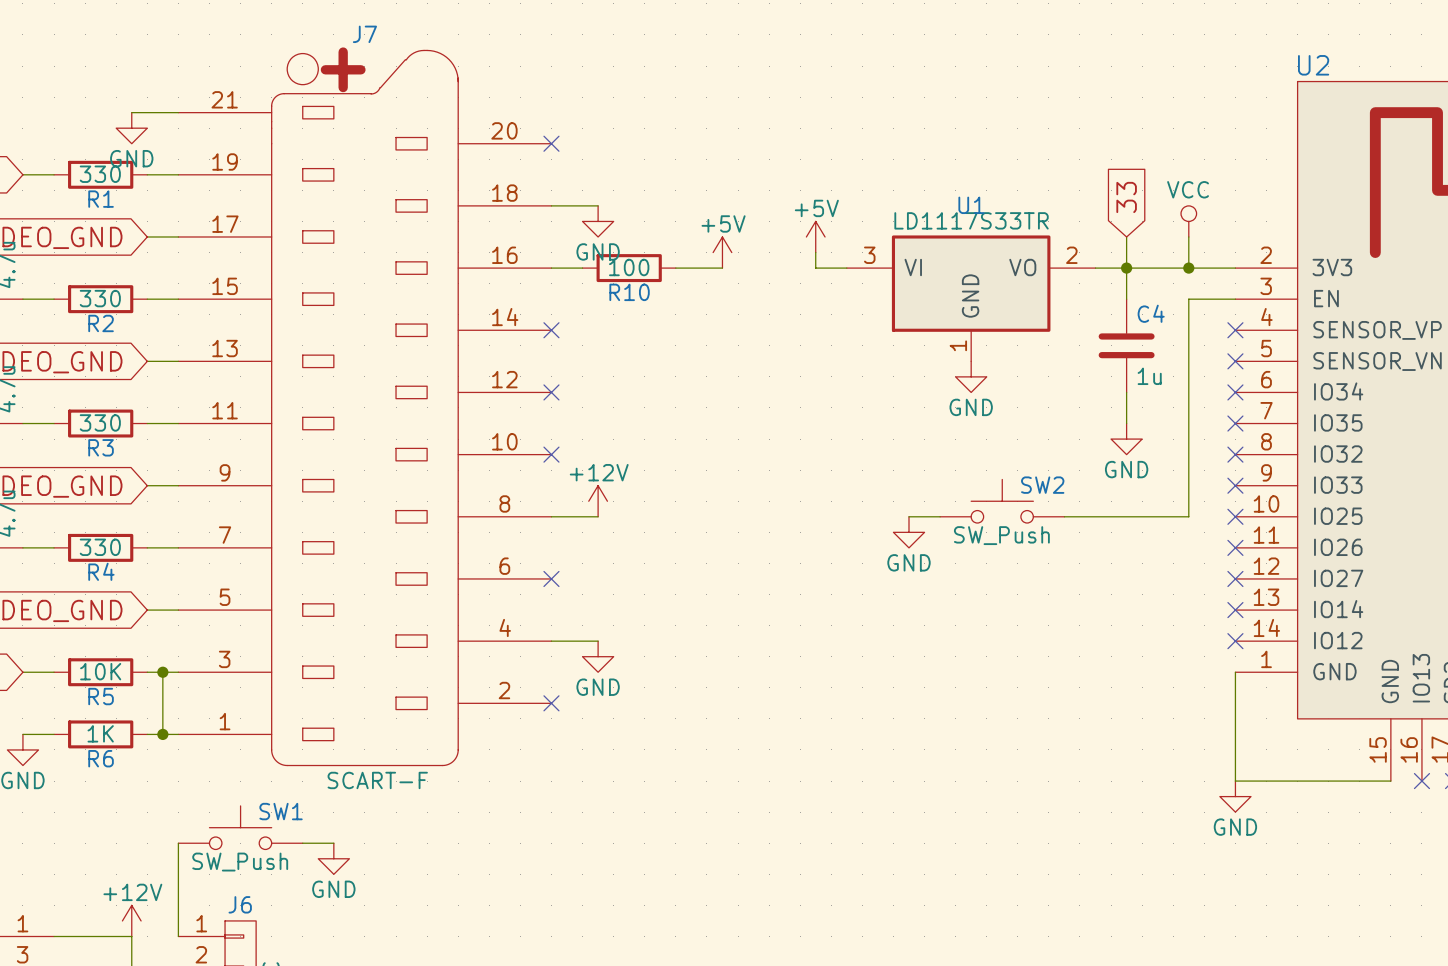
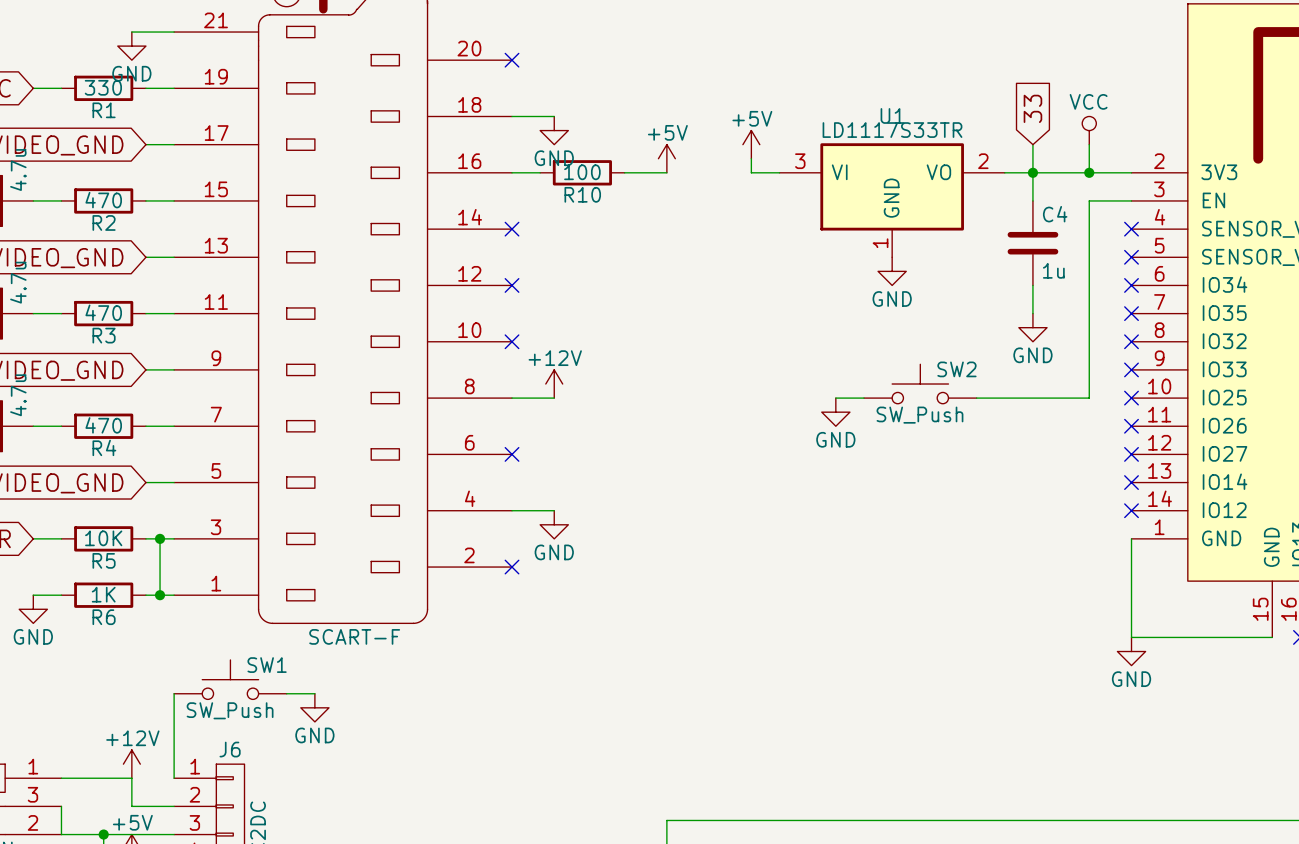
R2 value: 330 (100, 298) -> 470 (103, 200)
R3 value: 330 (100, 422) -> 470 (103, 312)
R4 value: 330 (100, 547) -> 470 (103, 425)

